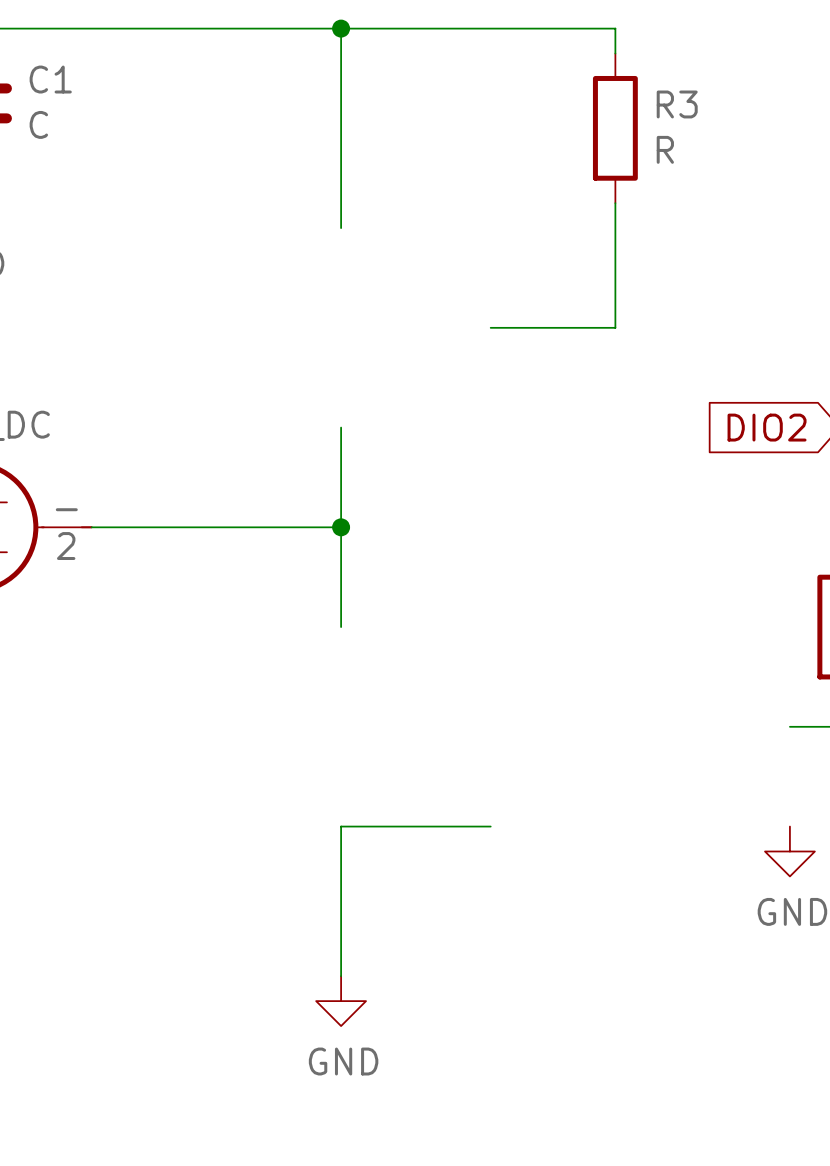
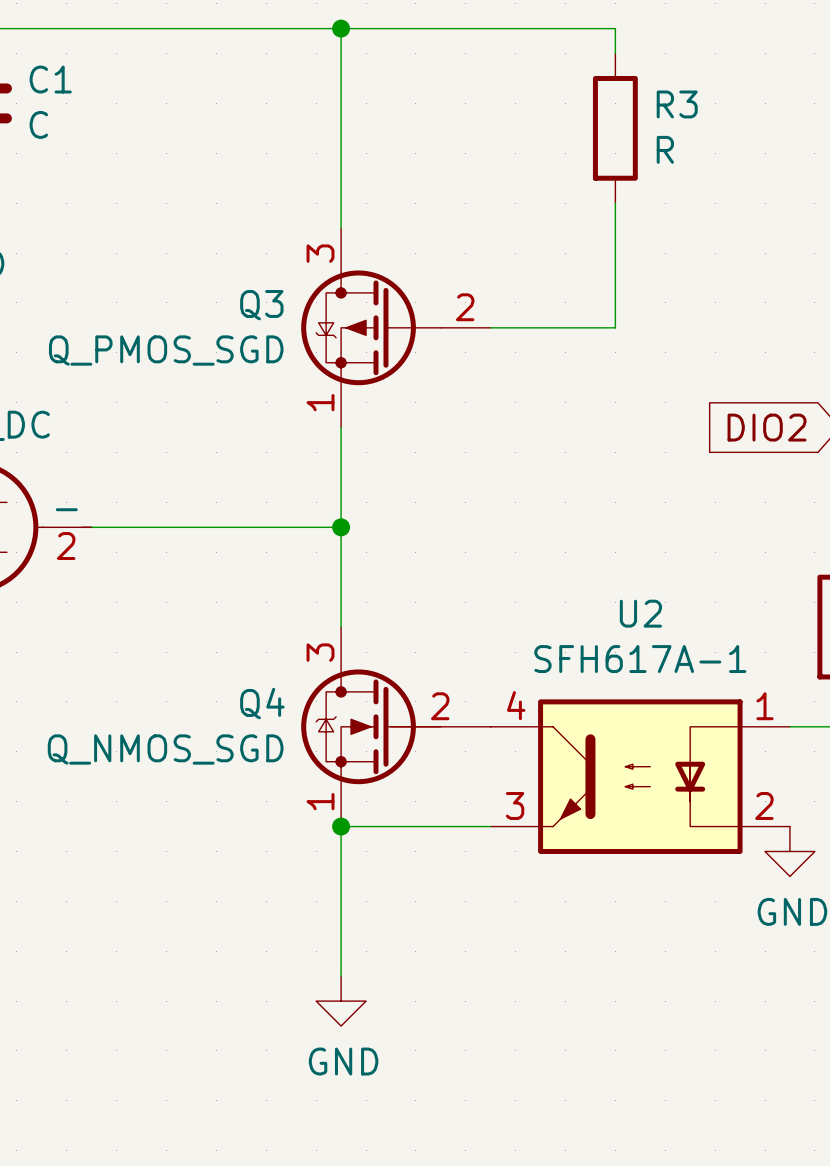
Q3: none -> Q_PMOS_SGD (395, 327)
Q4: none -> Q_NMOS_SGD (395, 726)
U2: none -> SFH617A-1 (640, 776)
junction: none -> (341, 826)

